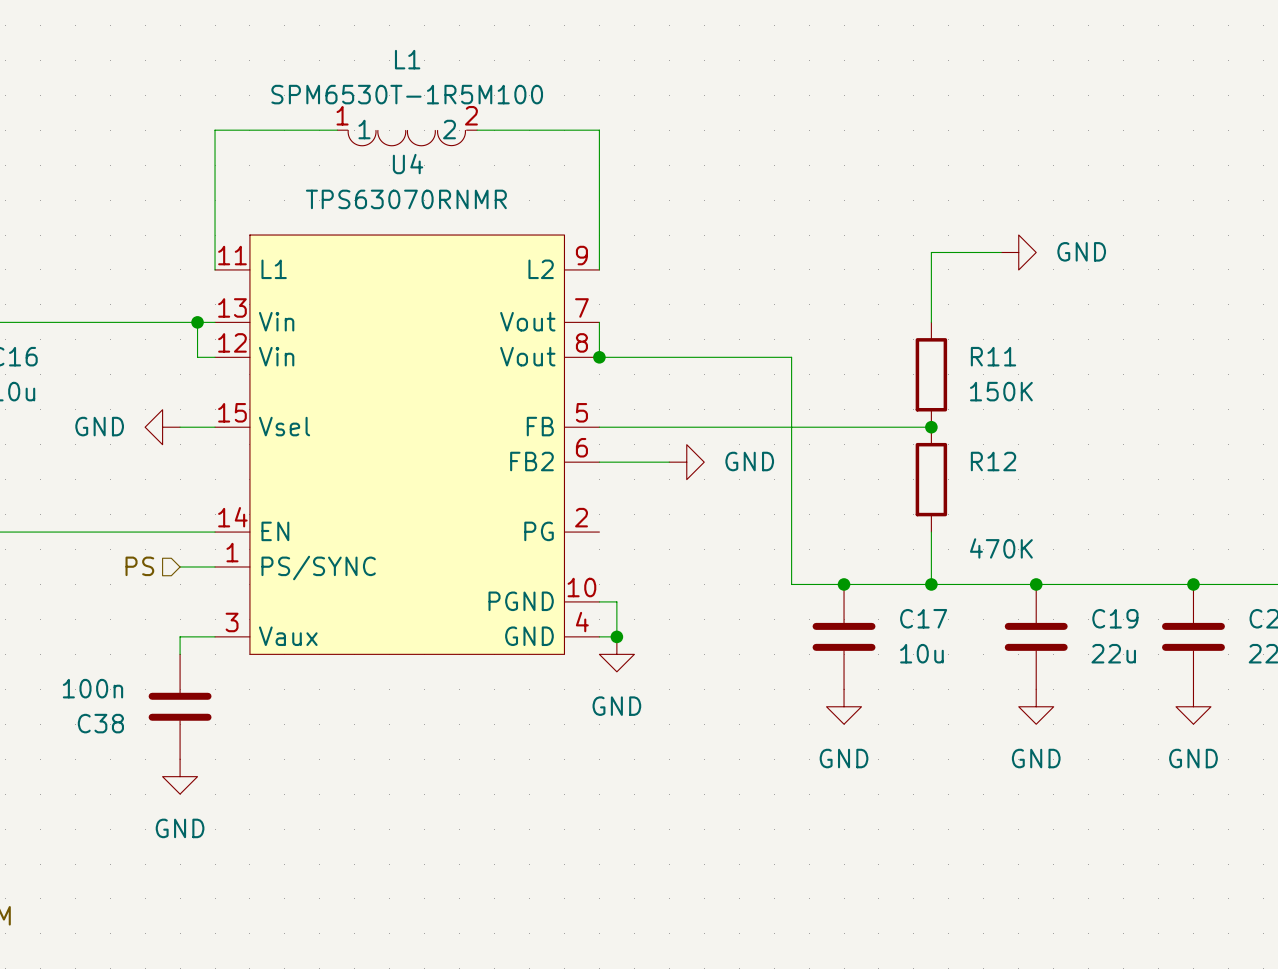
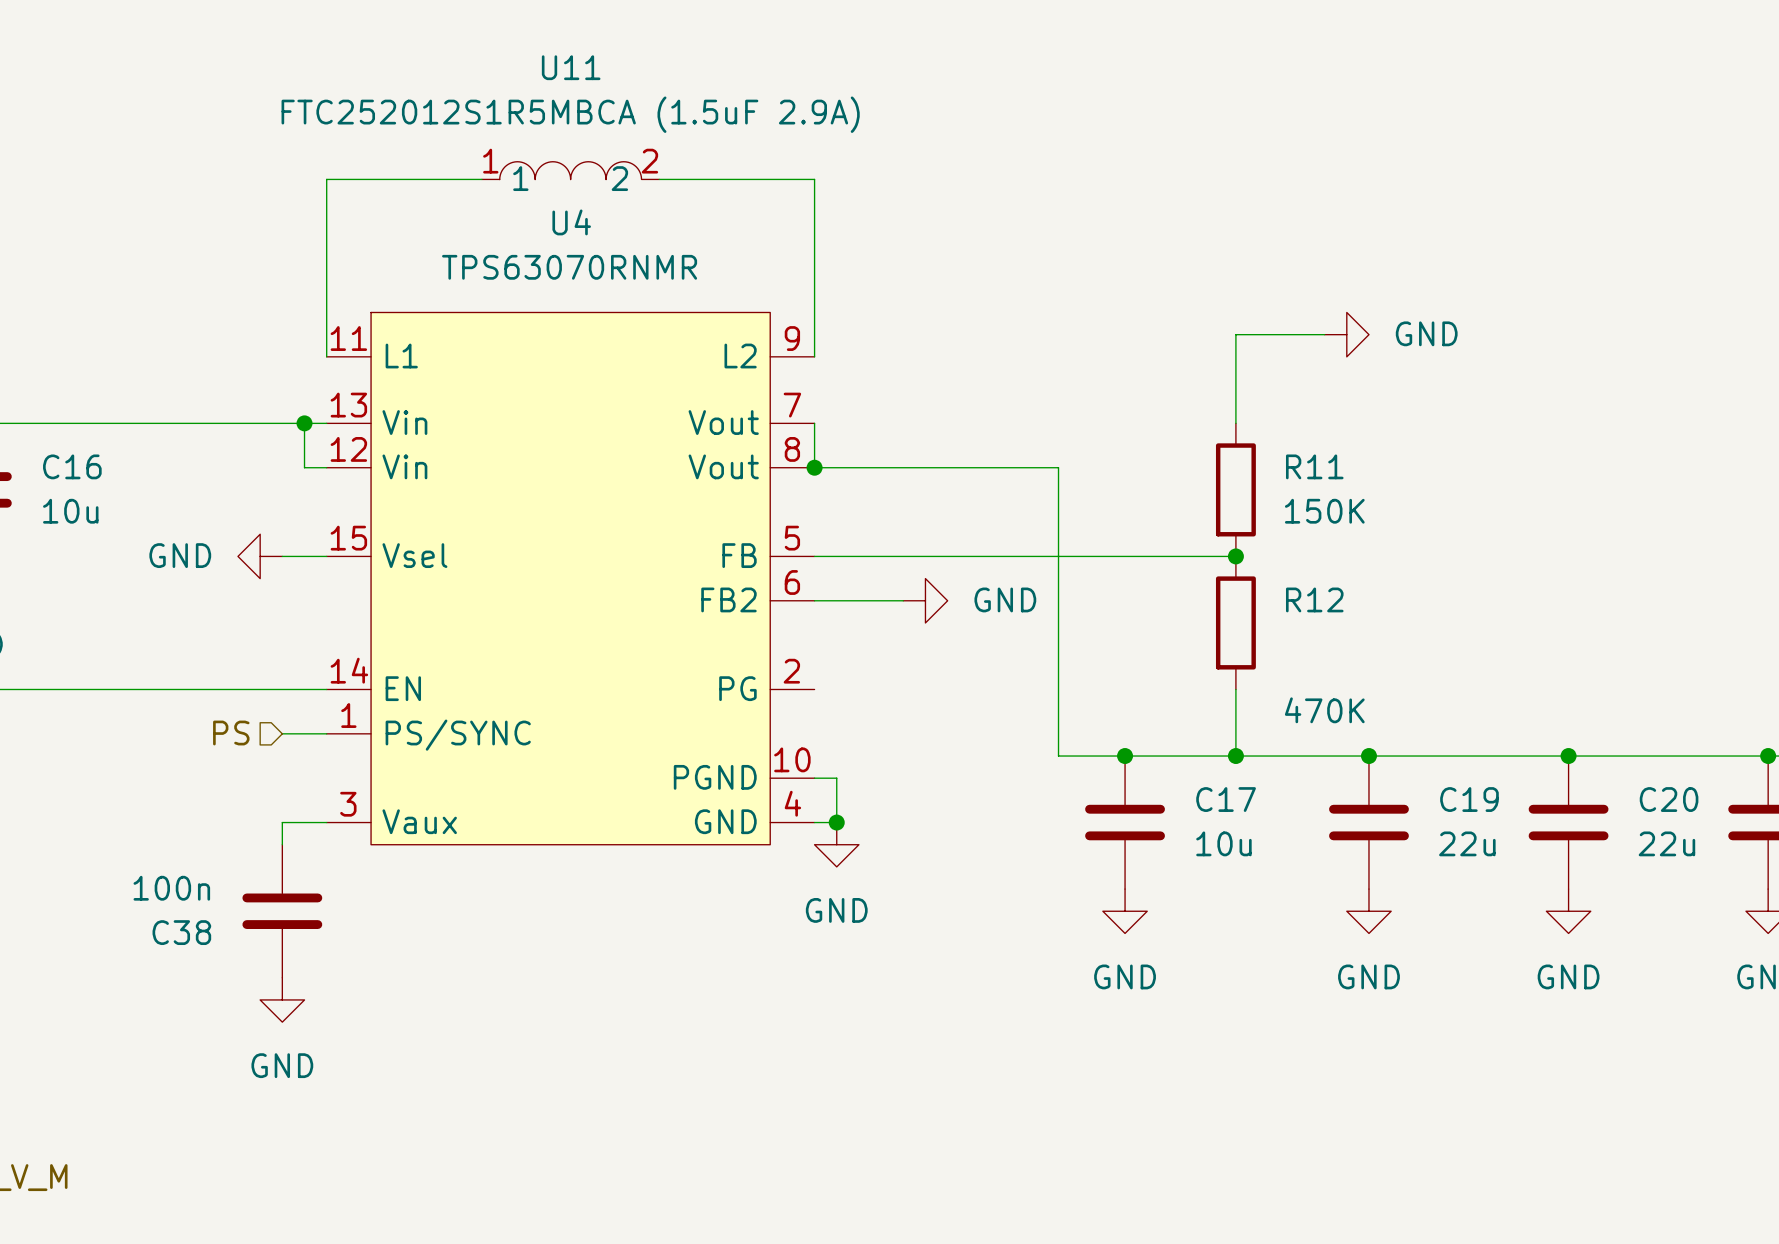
U11: none -> FTC252012S1R5MBCA (1.5uF 2.9A) (570, 170)
L1: SPM6530T-1R5M100 (407, 137) -> none

